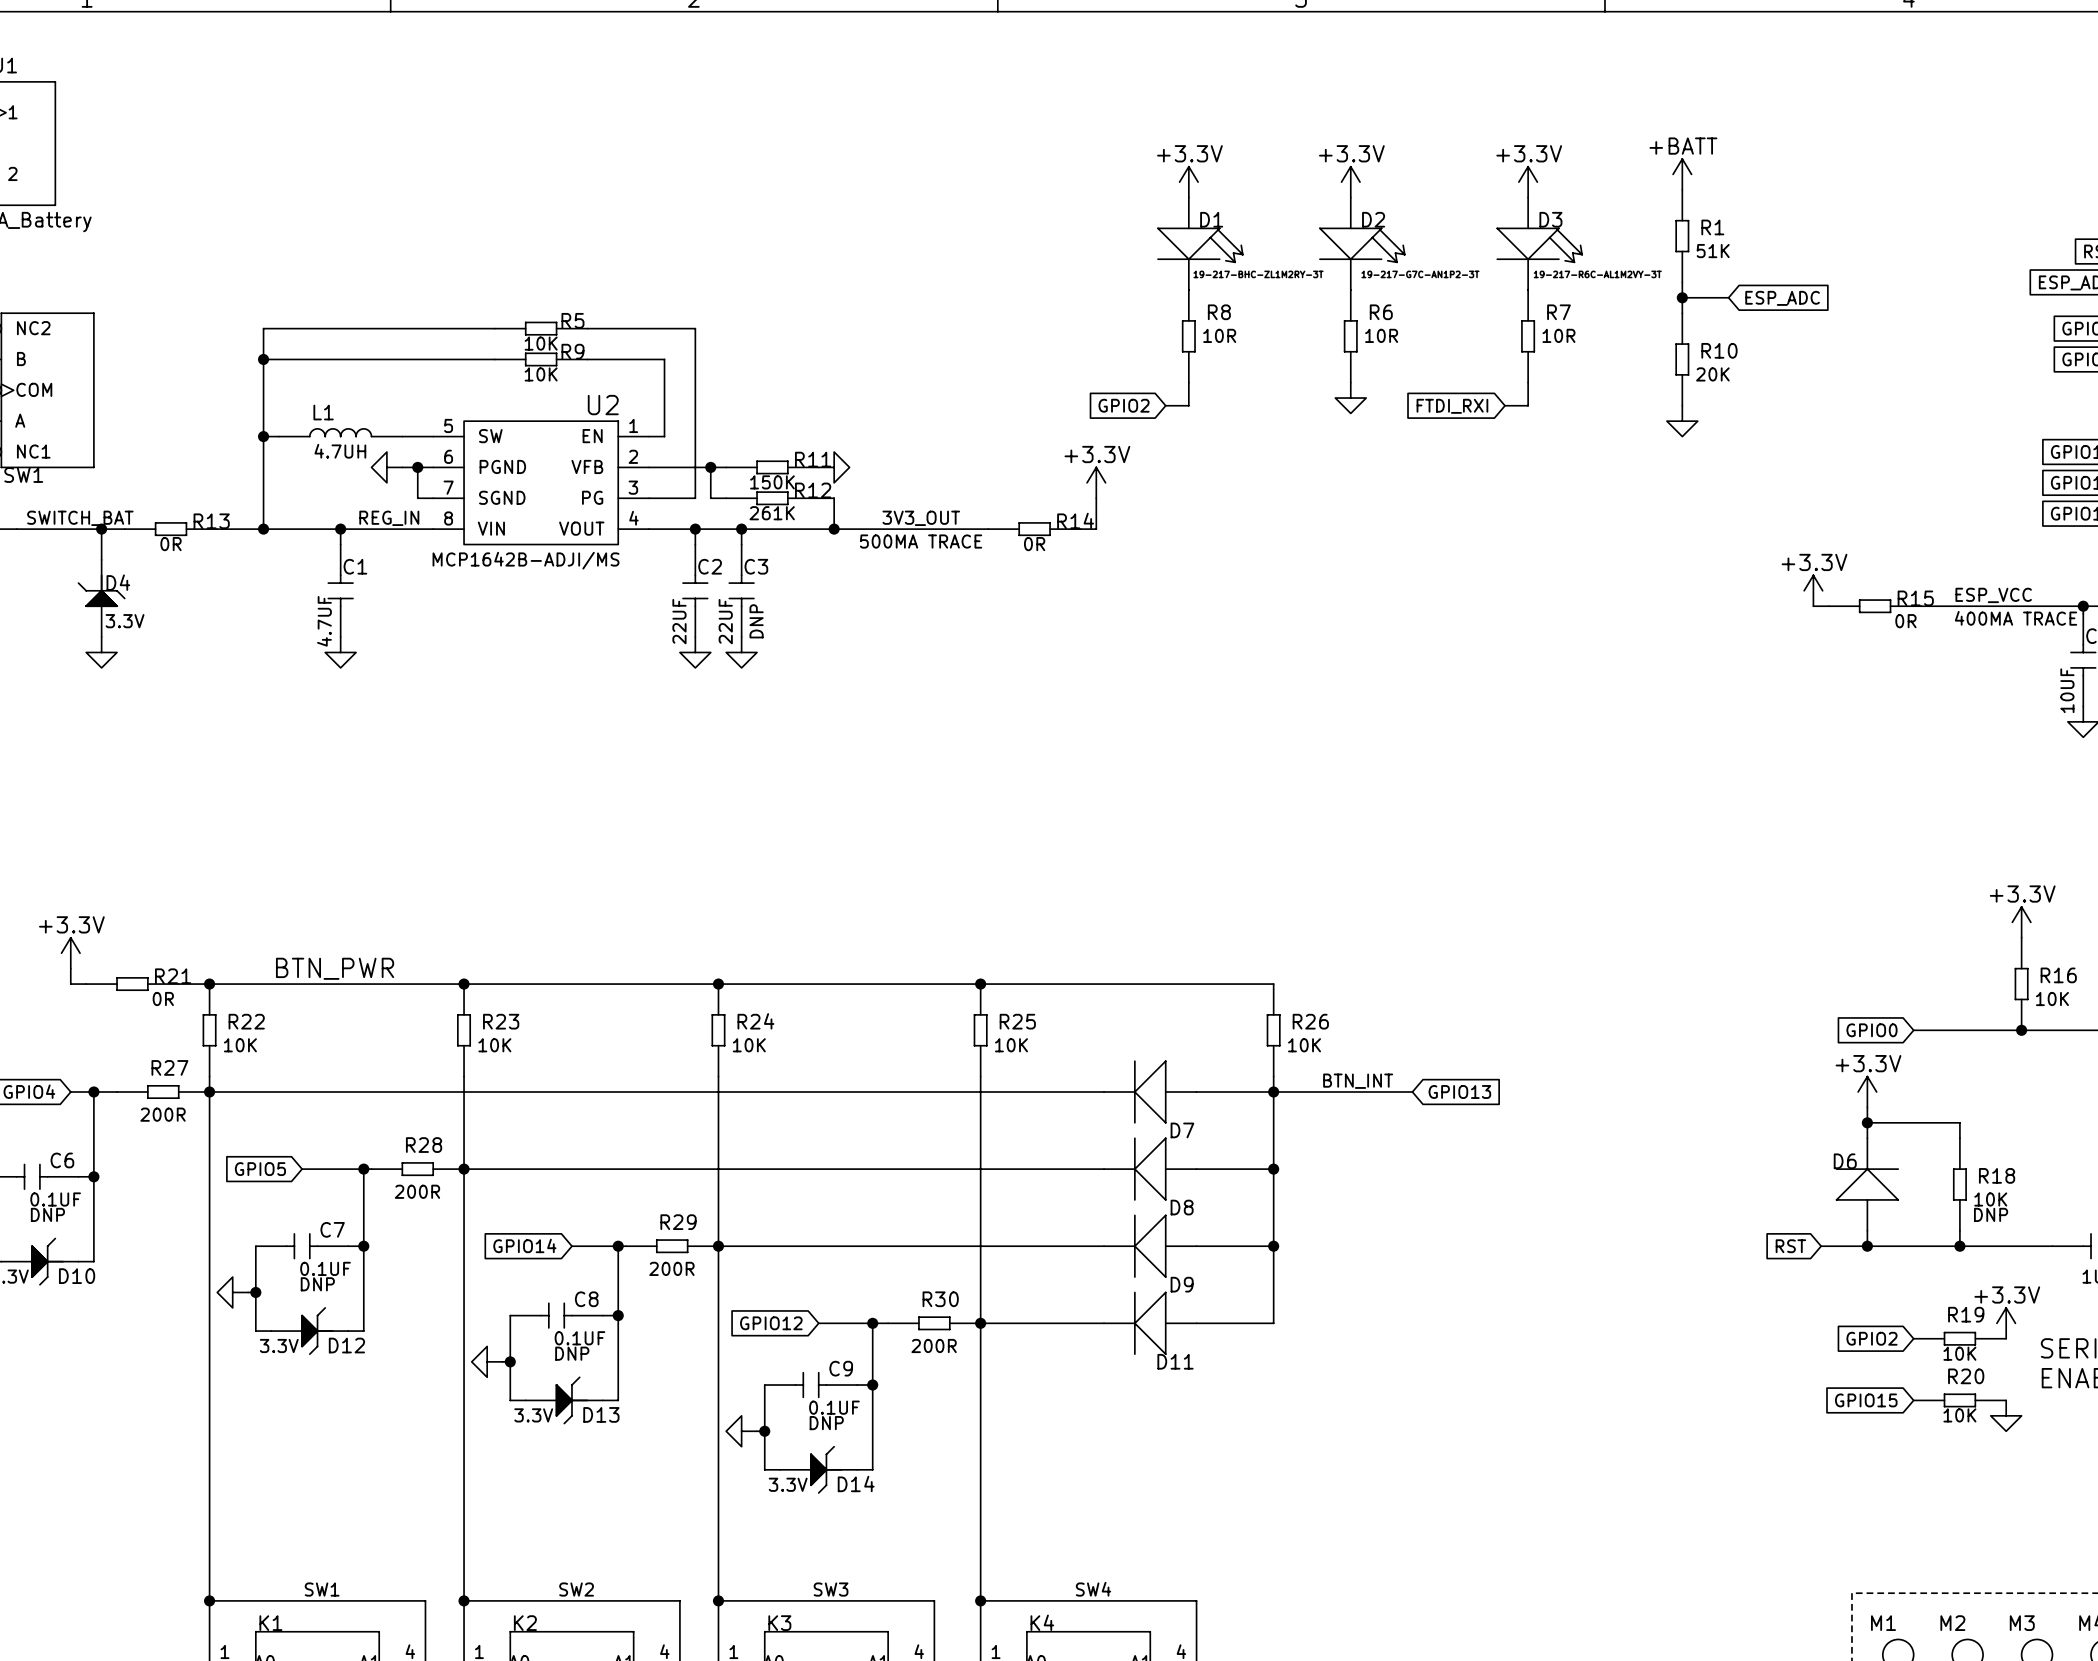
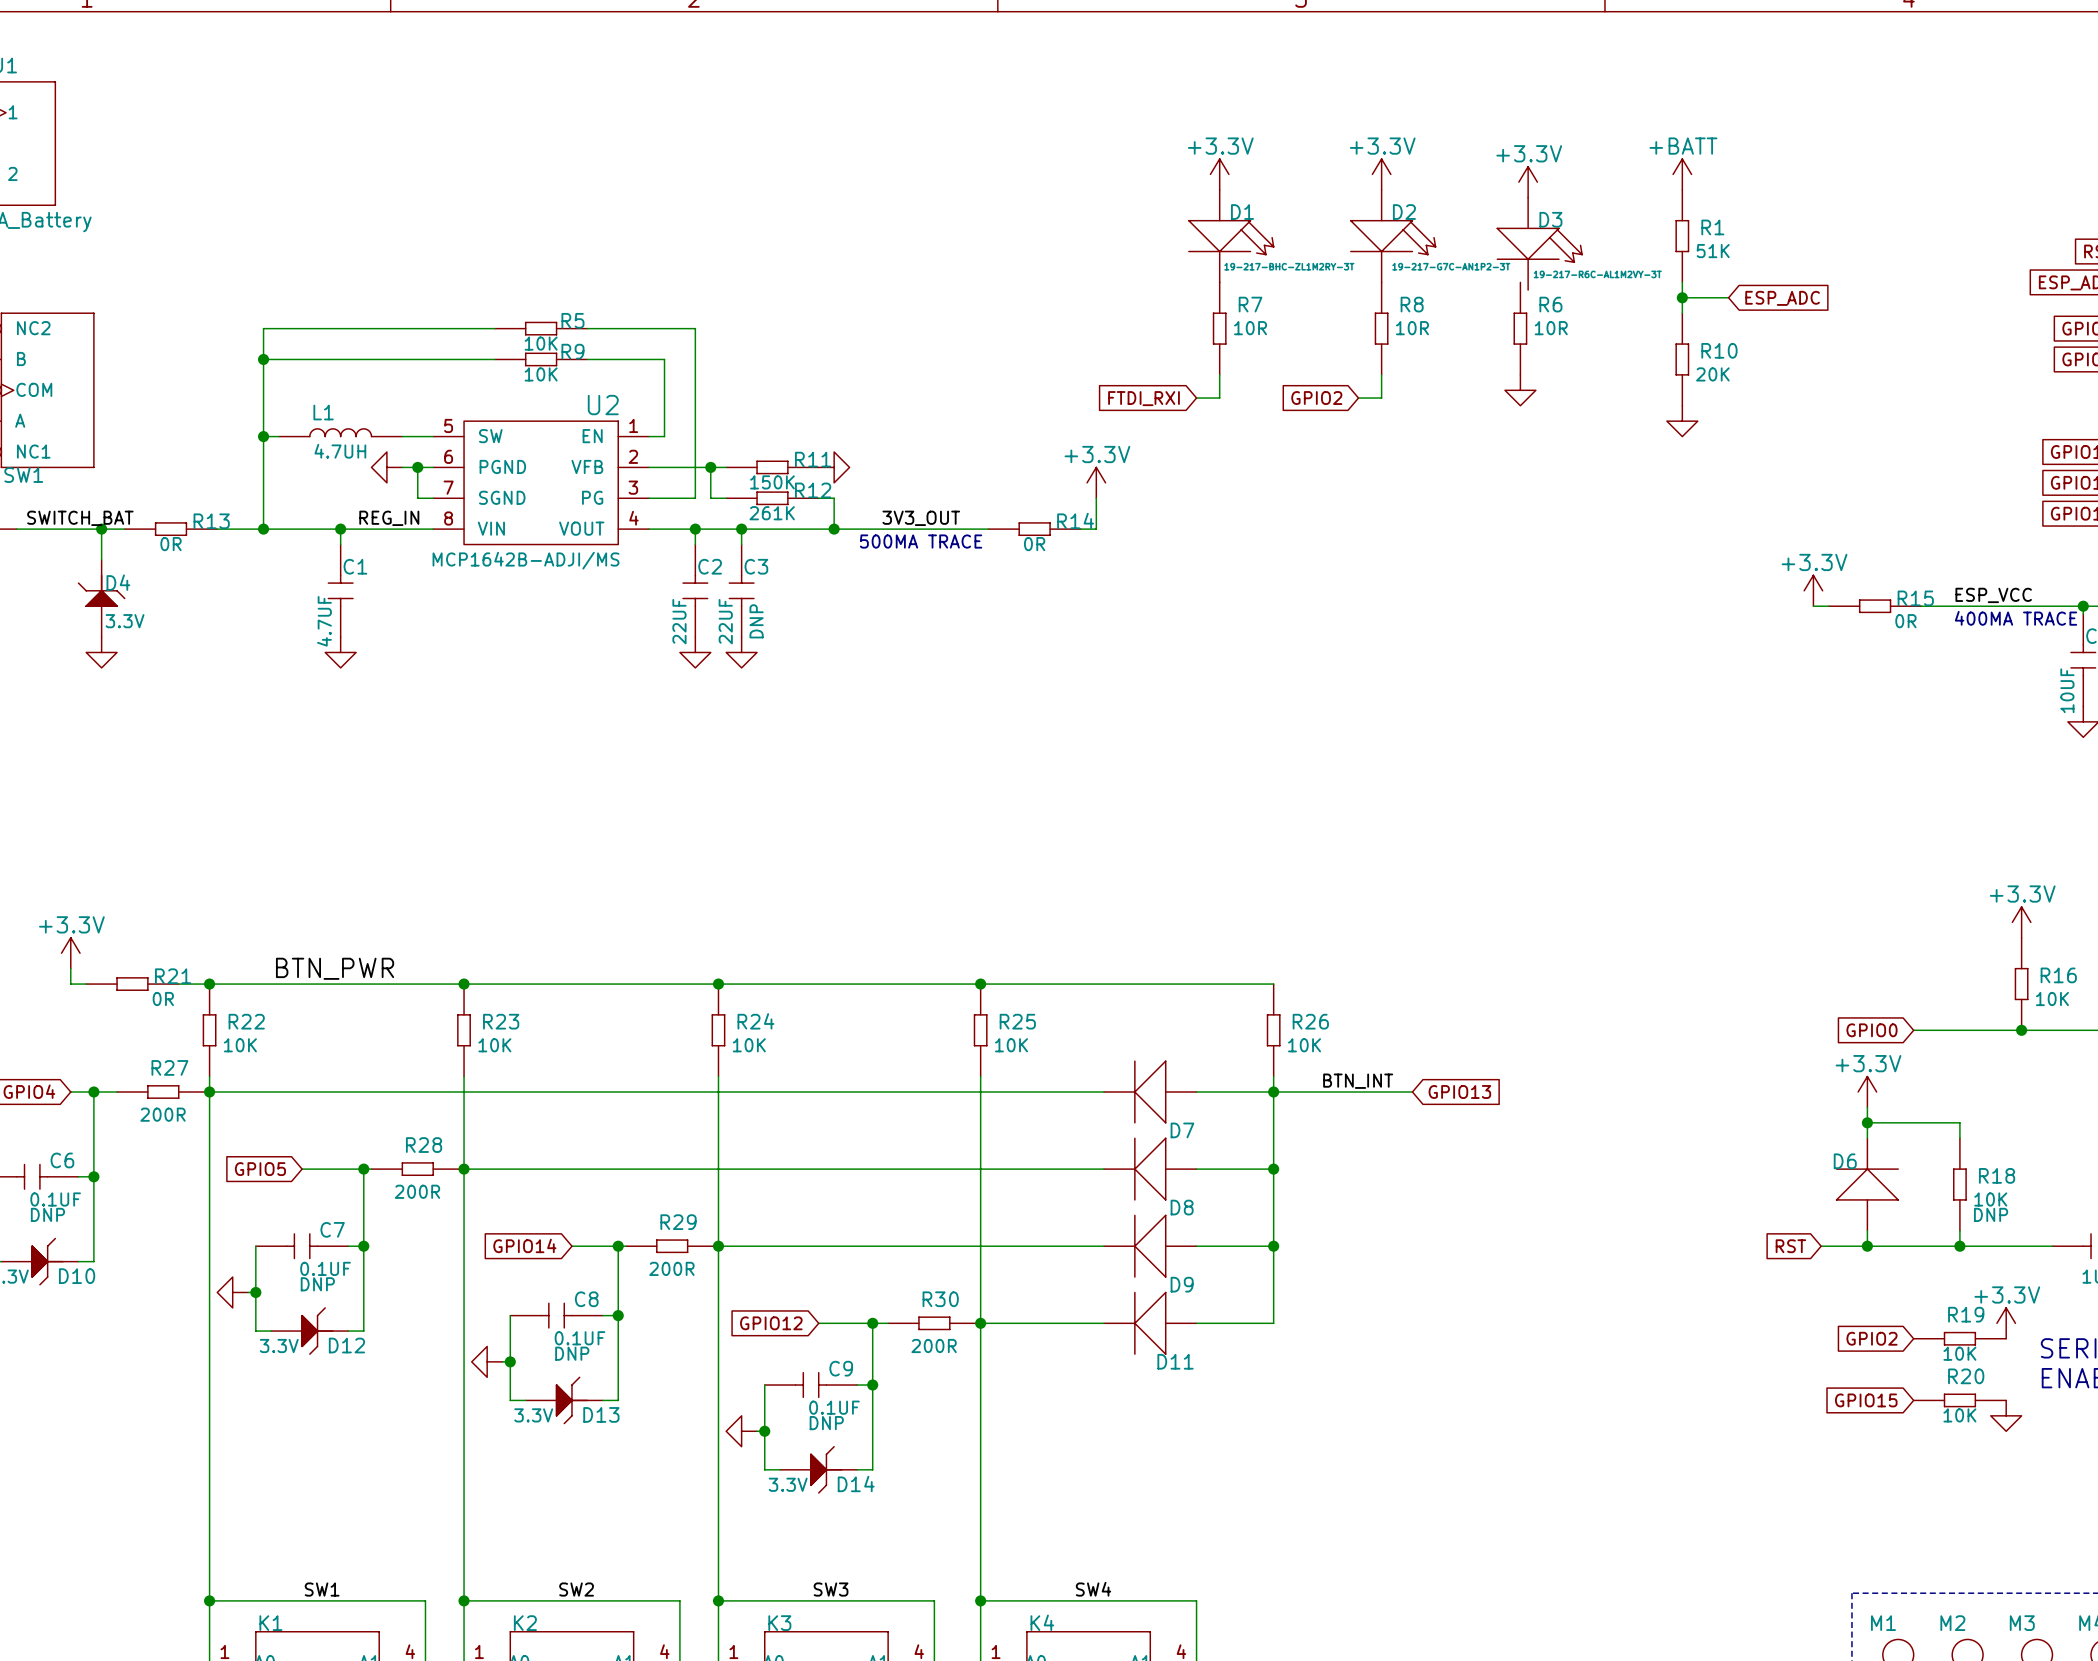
power symbol position: +3.3V (1188, 182) -> +3.3V (1219, 174)
power symbol position: +3.3V (1350, 182) -> +3.3V (1381, 174)
D1 position: (1200, 243) -> (1231, 236)
D2 position: (1362, 243) -> (1393, 236)
R8 position: (1188, 336) -> (1381, 328)
R6 position: (1350, 336) -> (1520, 328)
R7 position: (1528, 336) -> (1219, 328)
wire: (1188, 382) (1188, 405) (1165, 405) -> (1219, 374) (1219, 398) (1196, 398)
wire: (1528, 382) (1528, 405) (1504, 405) -> (1381, 374) (1381, 398) (1358, 398)
global label: none -> FTDI_RXI (1144, 398)
power symbol position: (1350, 398) -> (1520, 390)
global label position: GPIO2 (1124, 405) -> GPIO2 (1316, 398)
global label: FTDI_RXI (1452, 406) -> none

